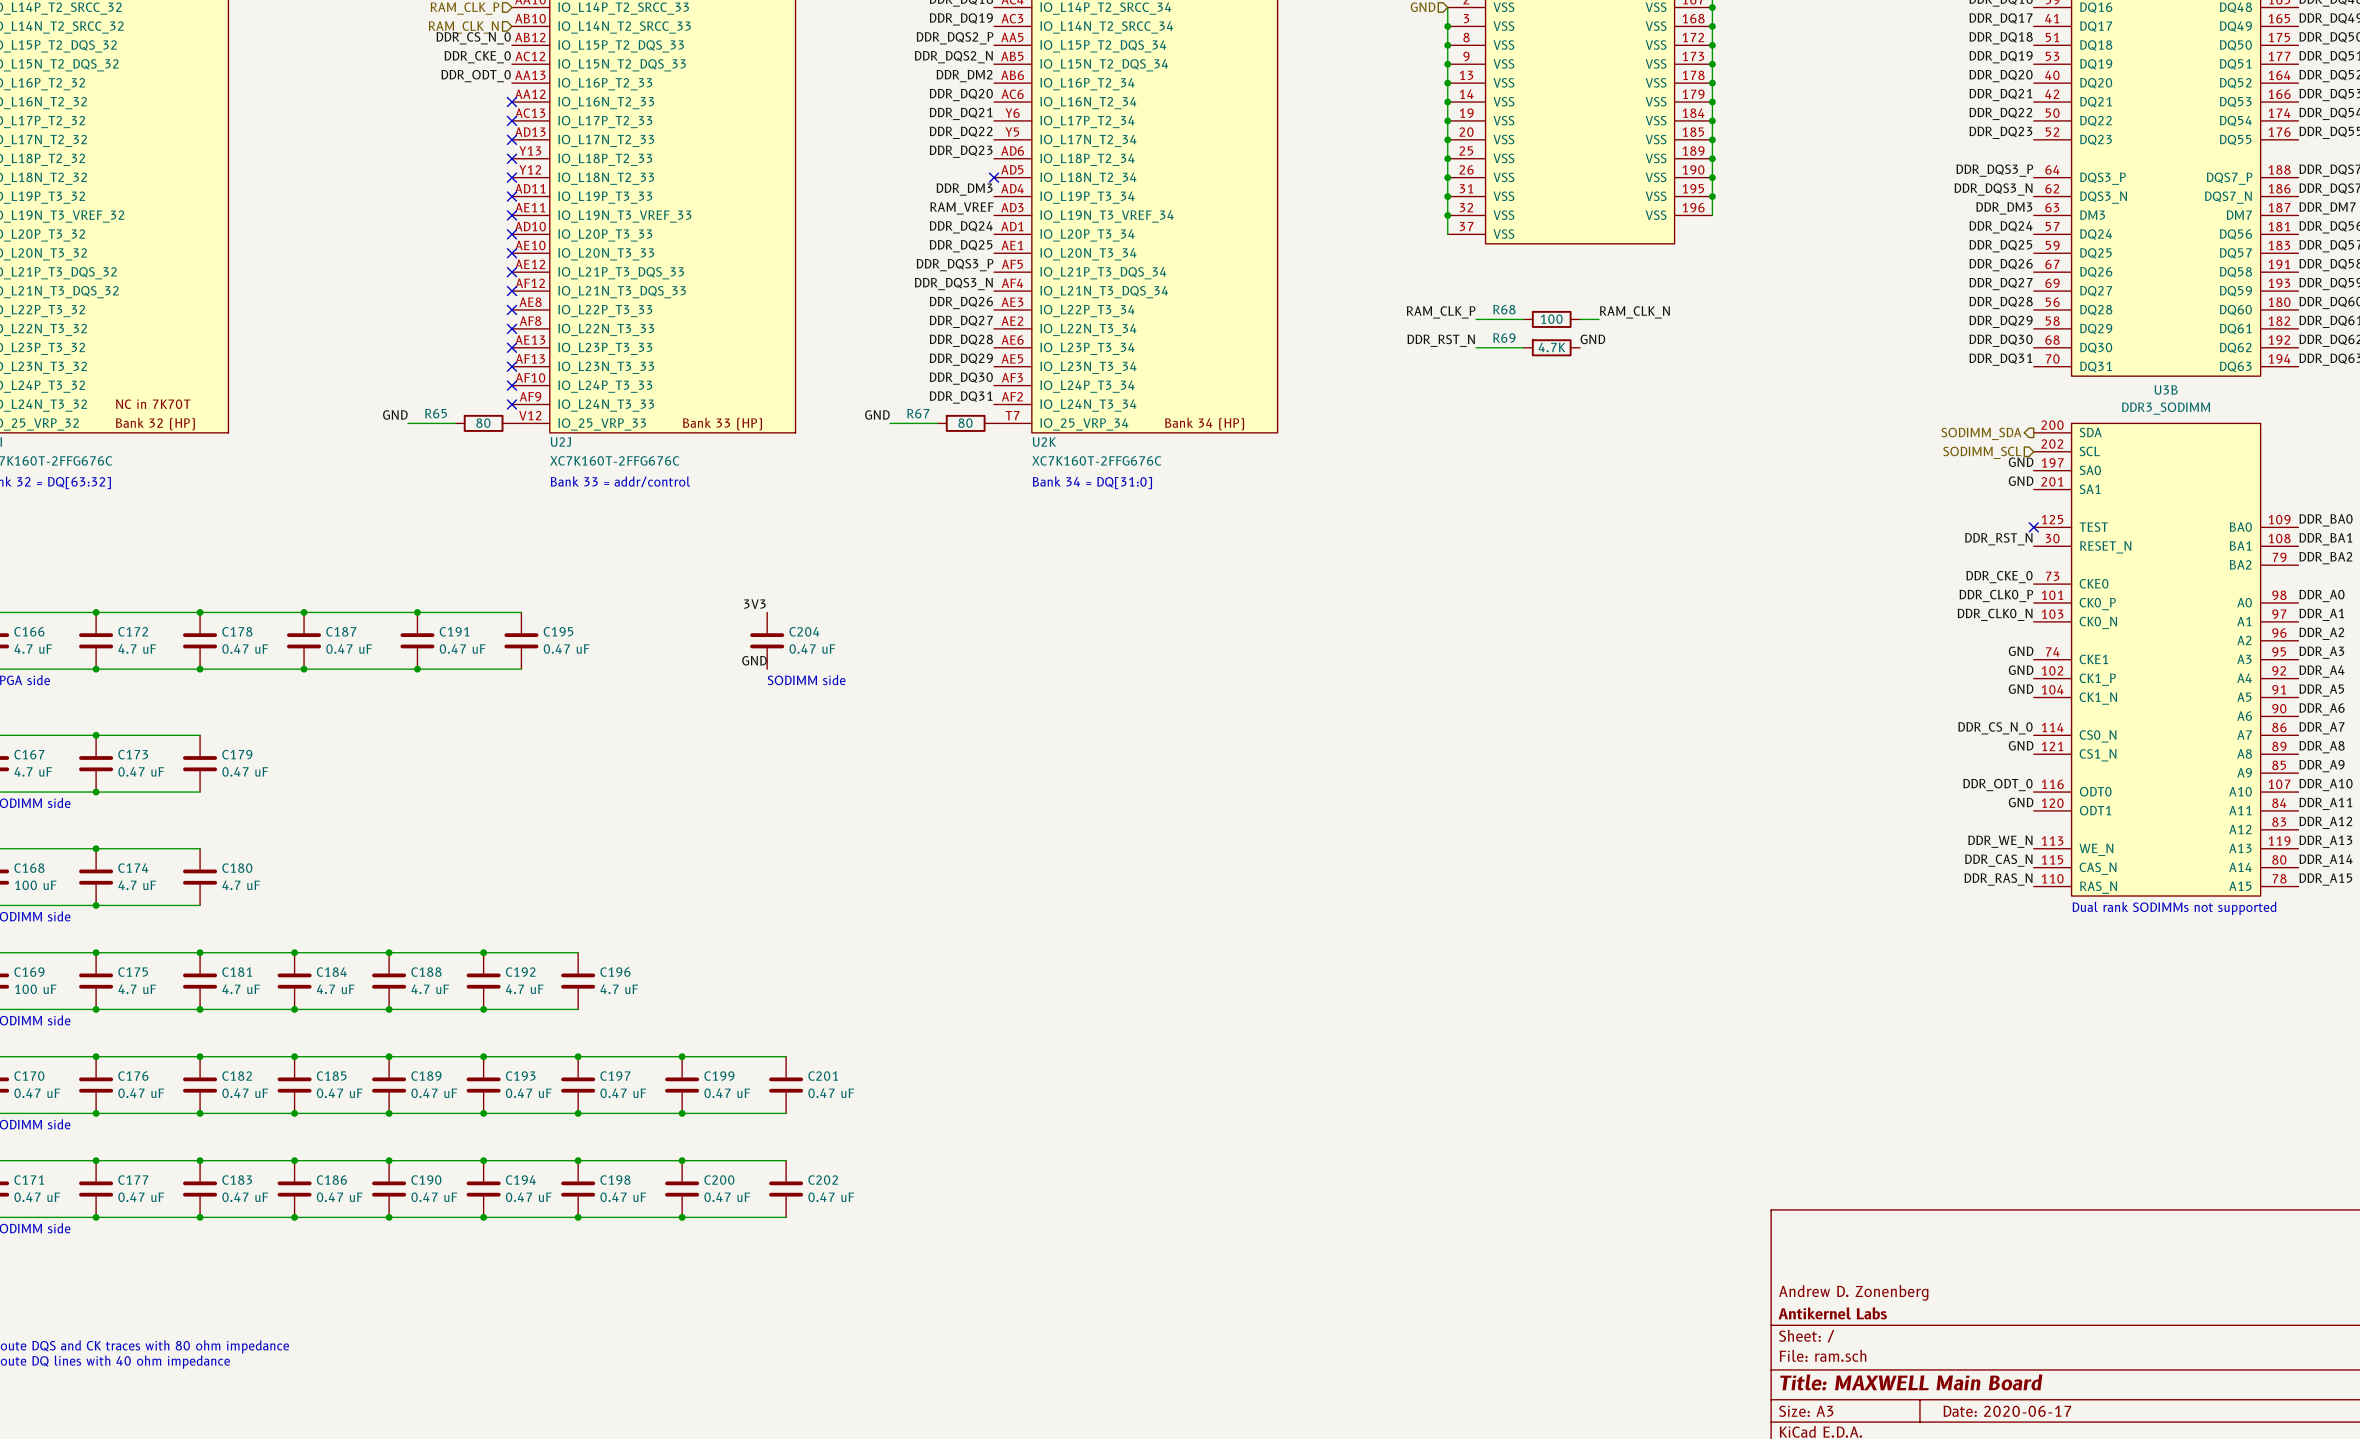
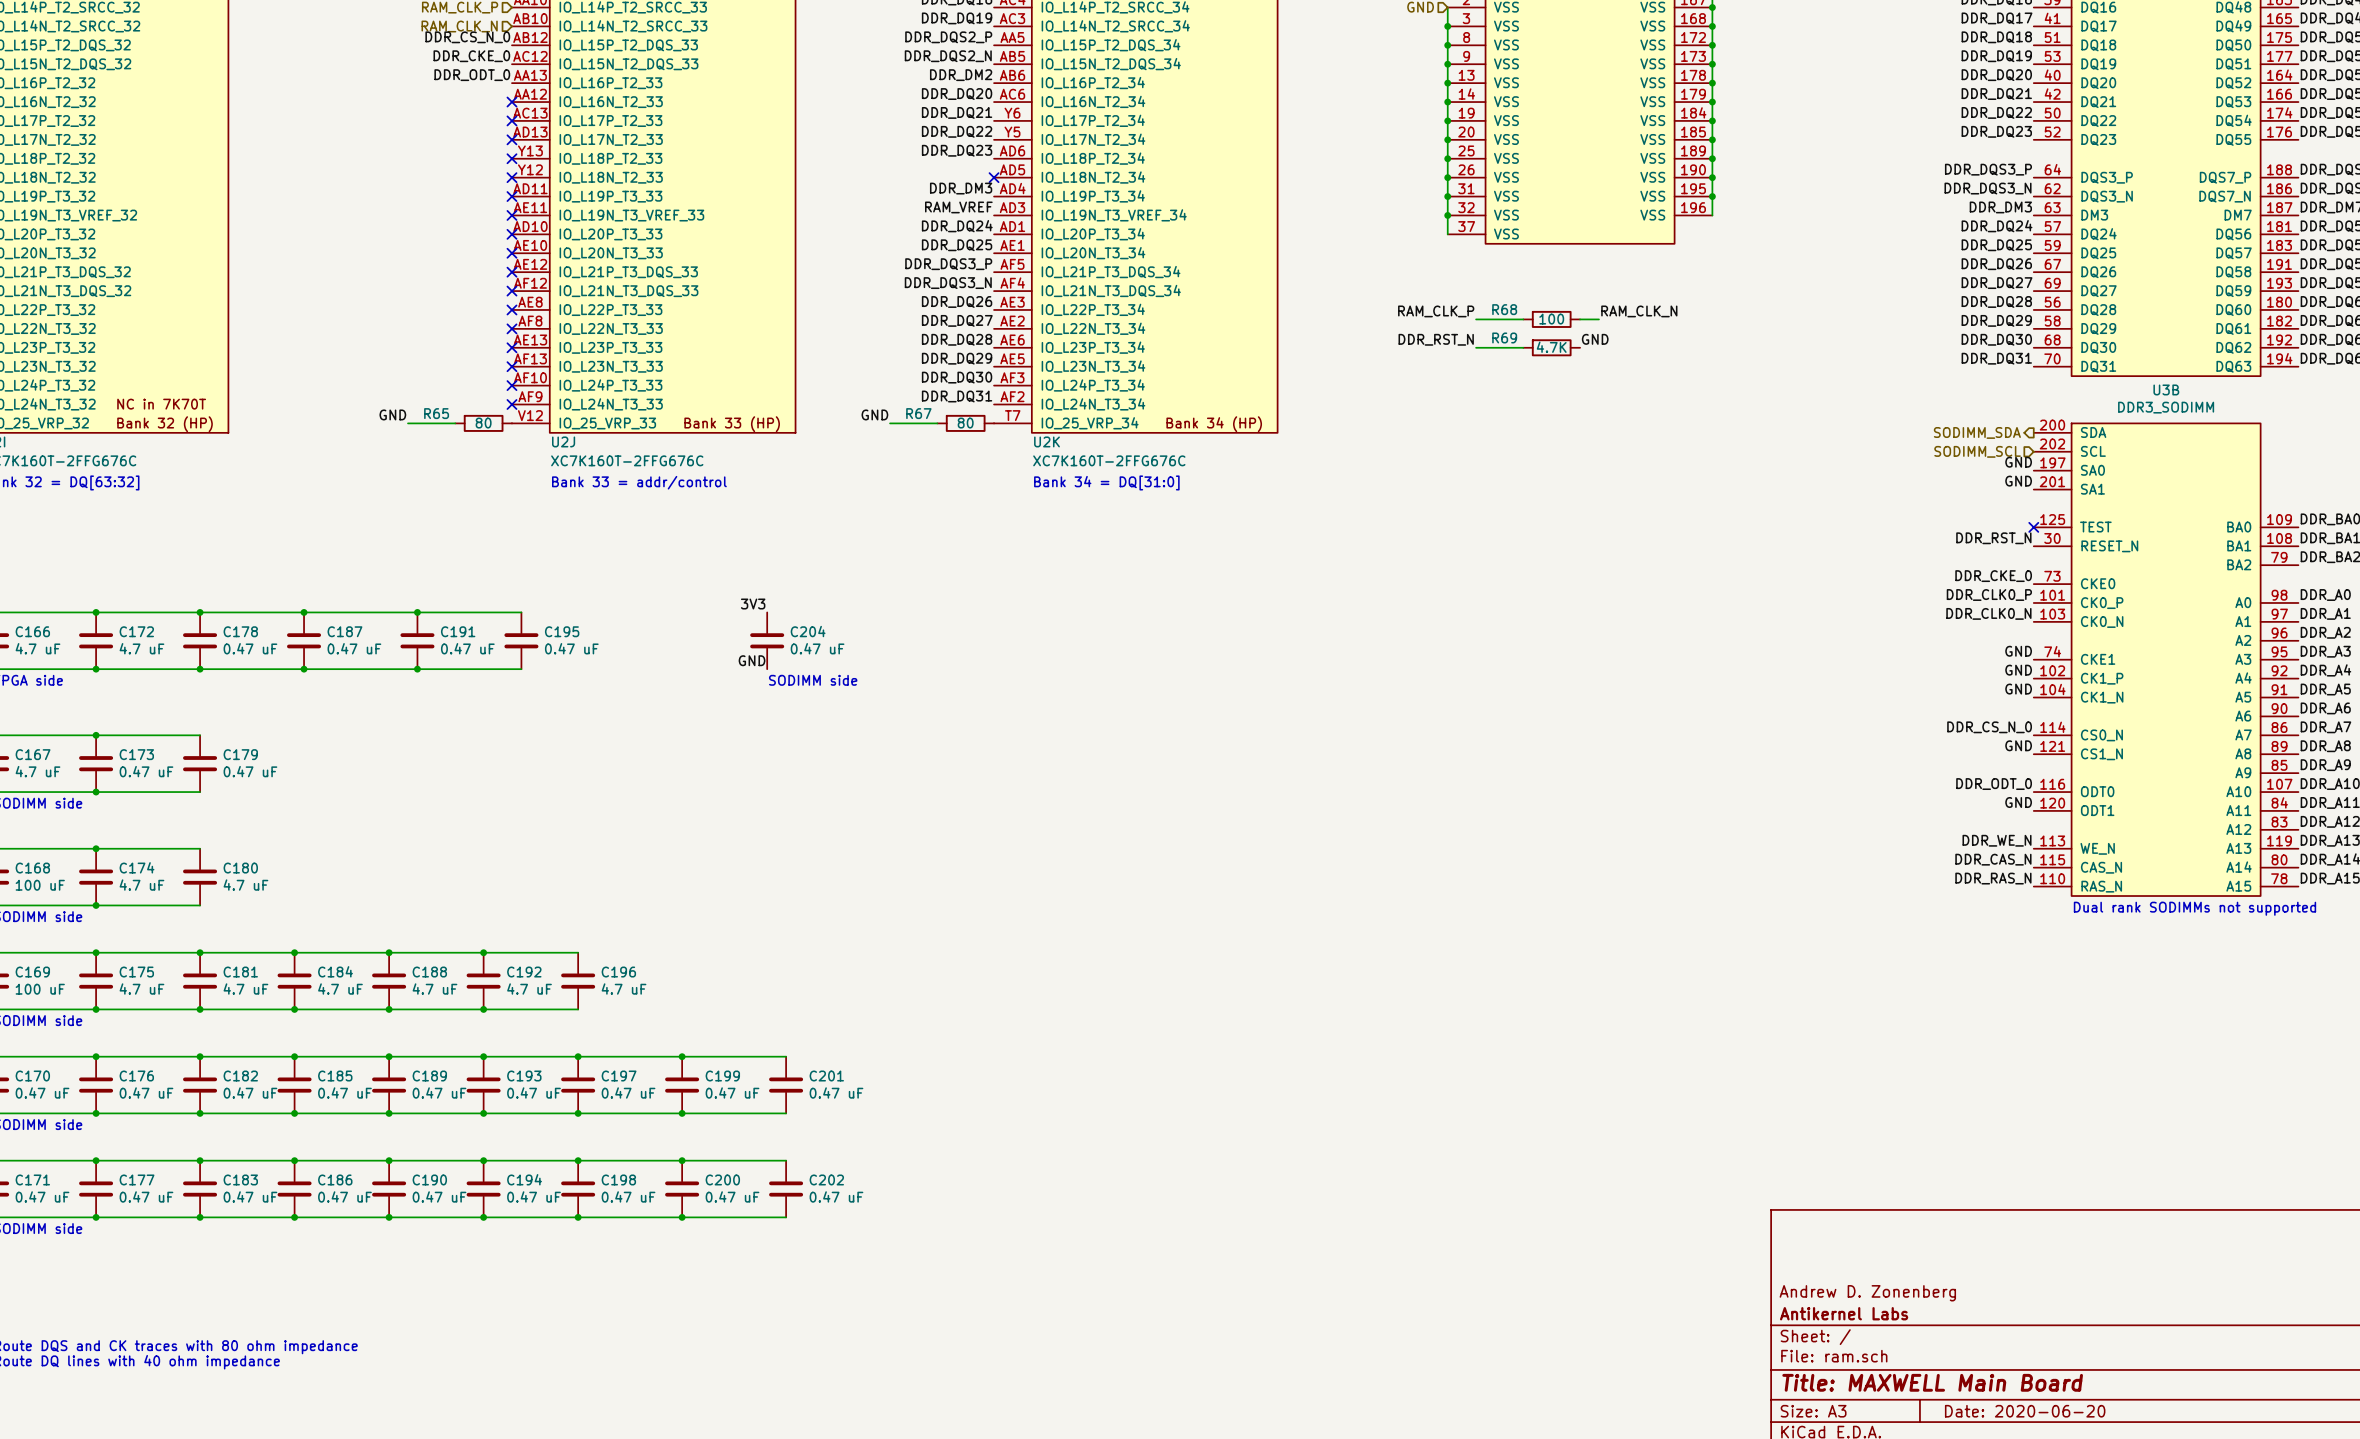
title block: Date: 2020-06-17 (2007, 1411) -> Date: 2020-06-20 (2025, 1411)

